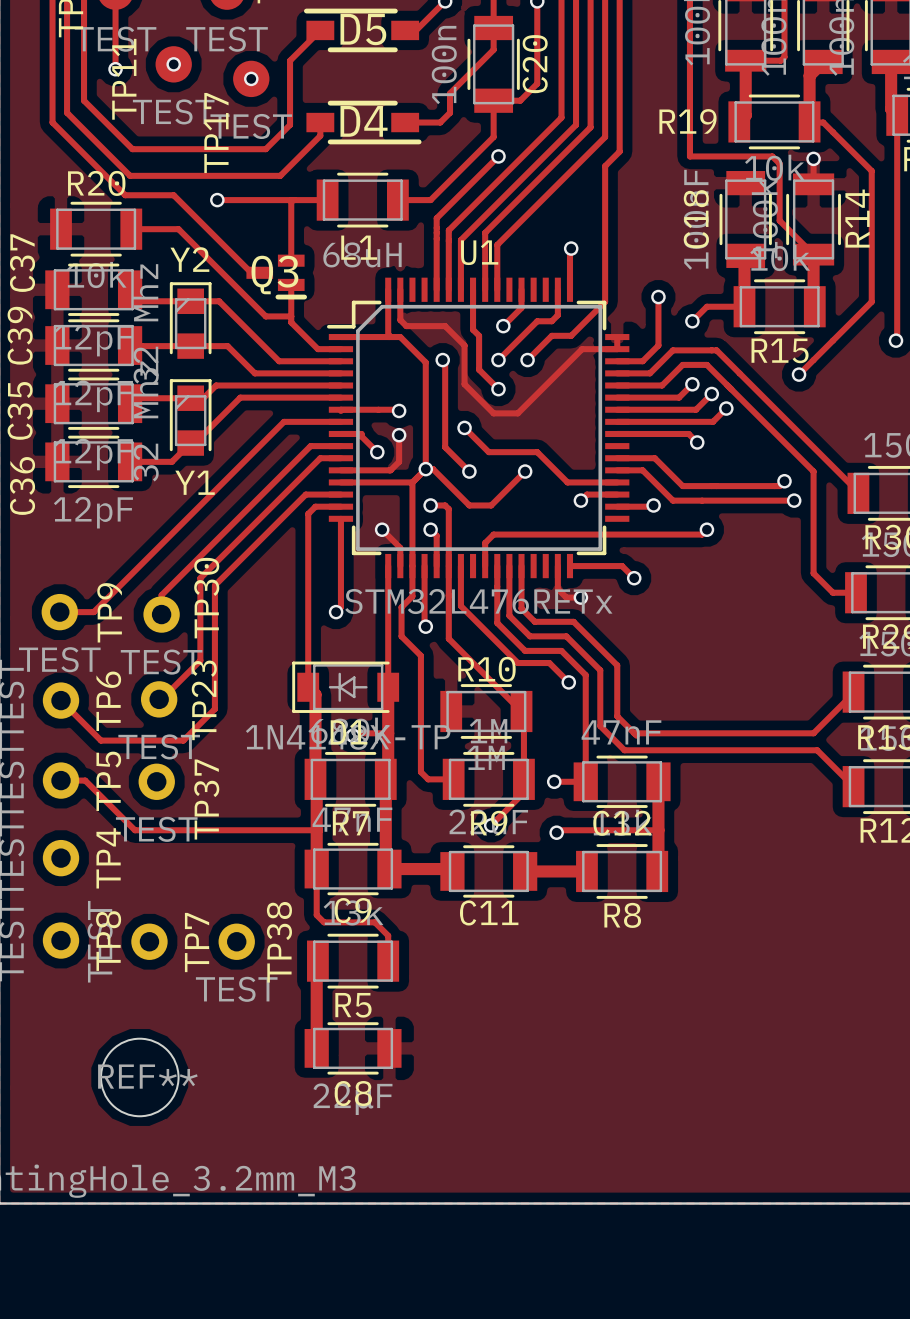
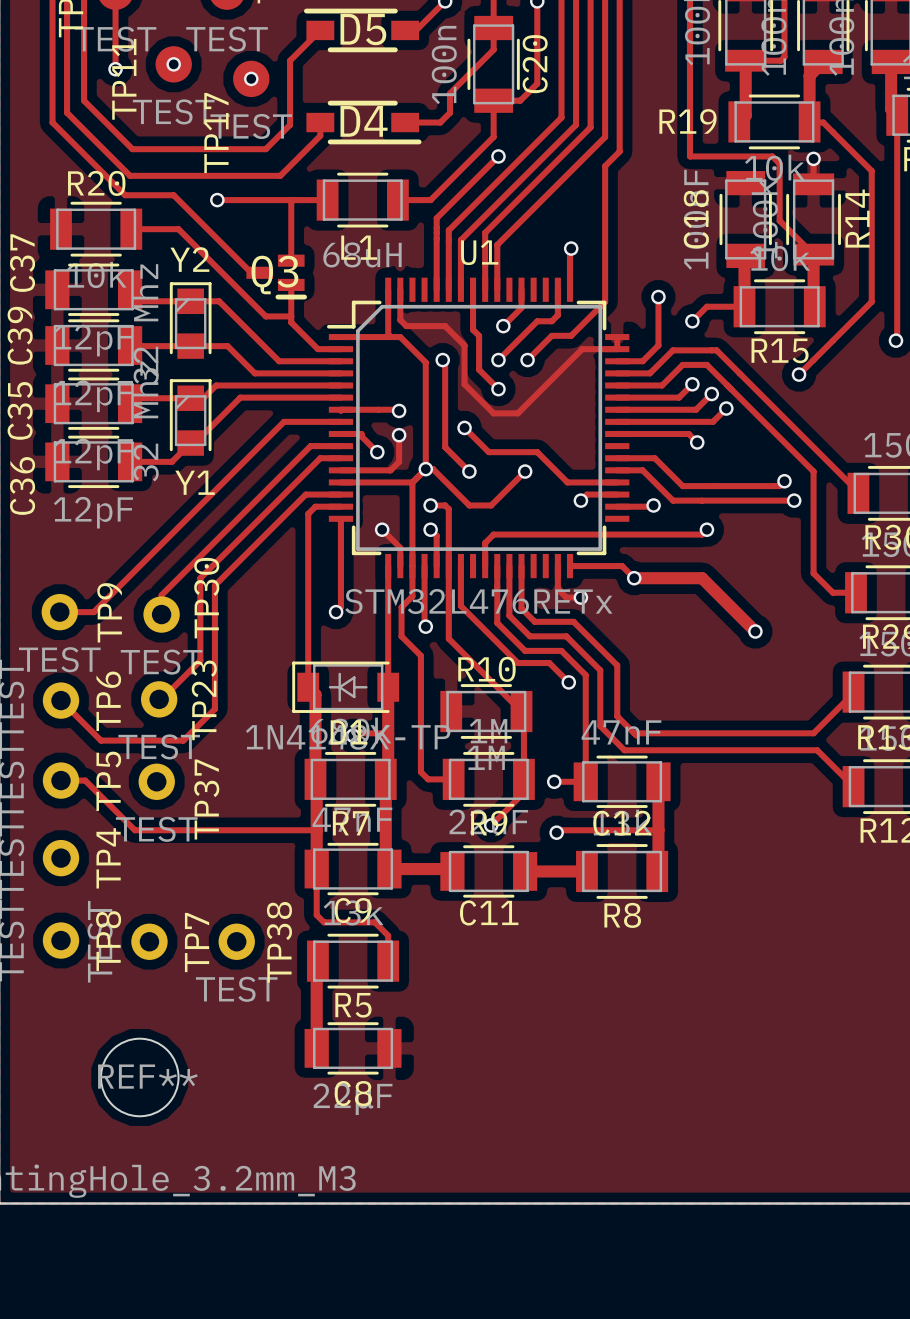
track: none -> (634, 578) (702, 578) (755, 631)
via: none -> (755, 631)

